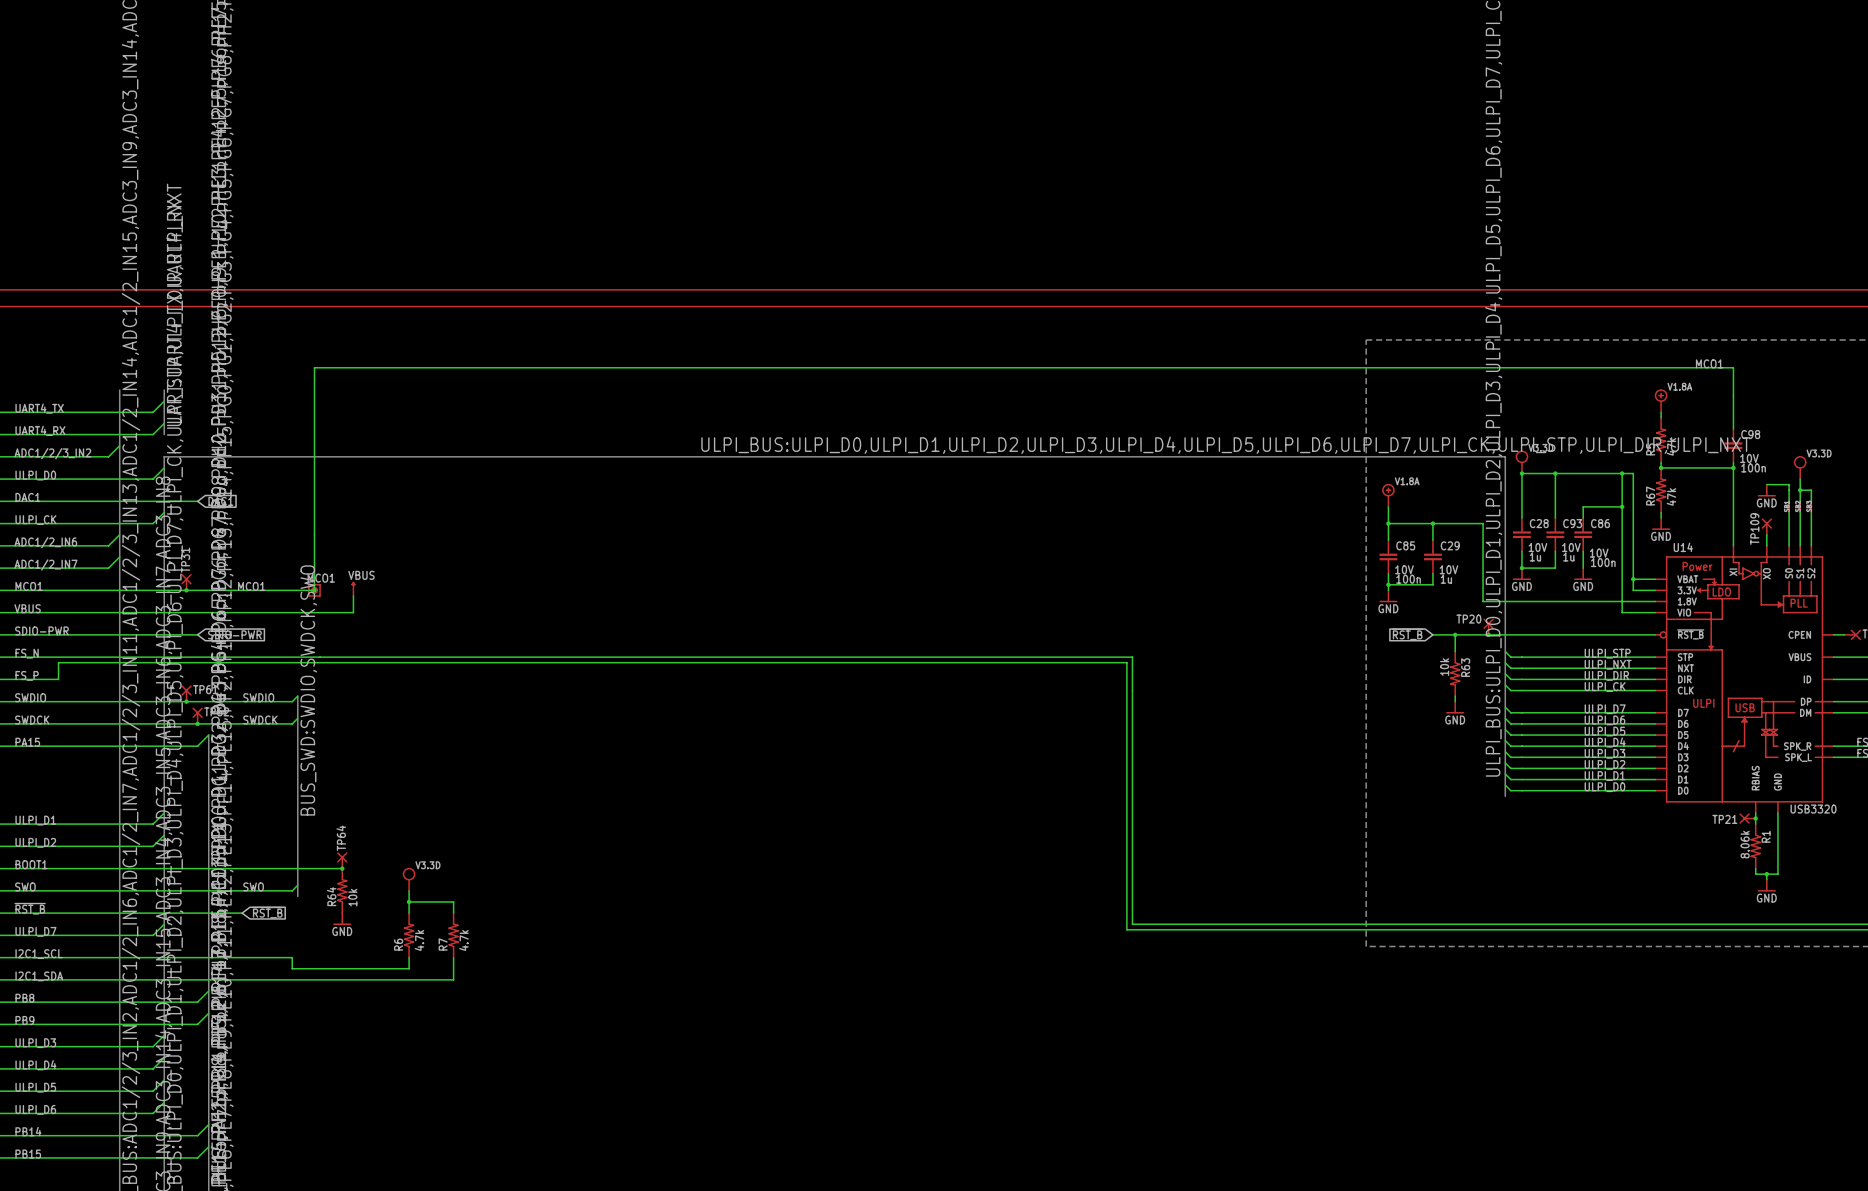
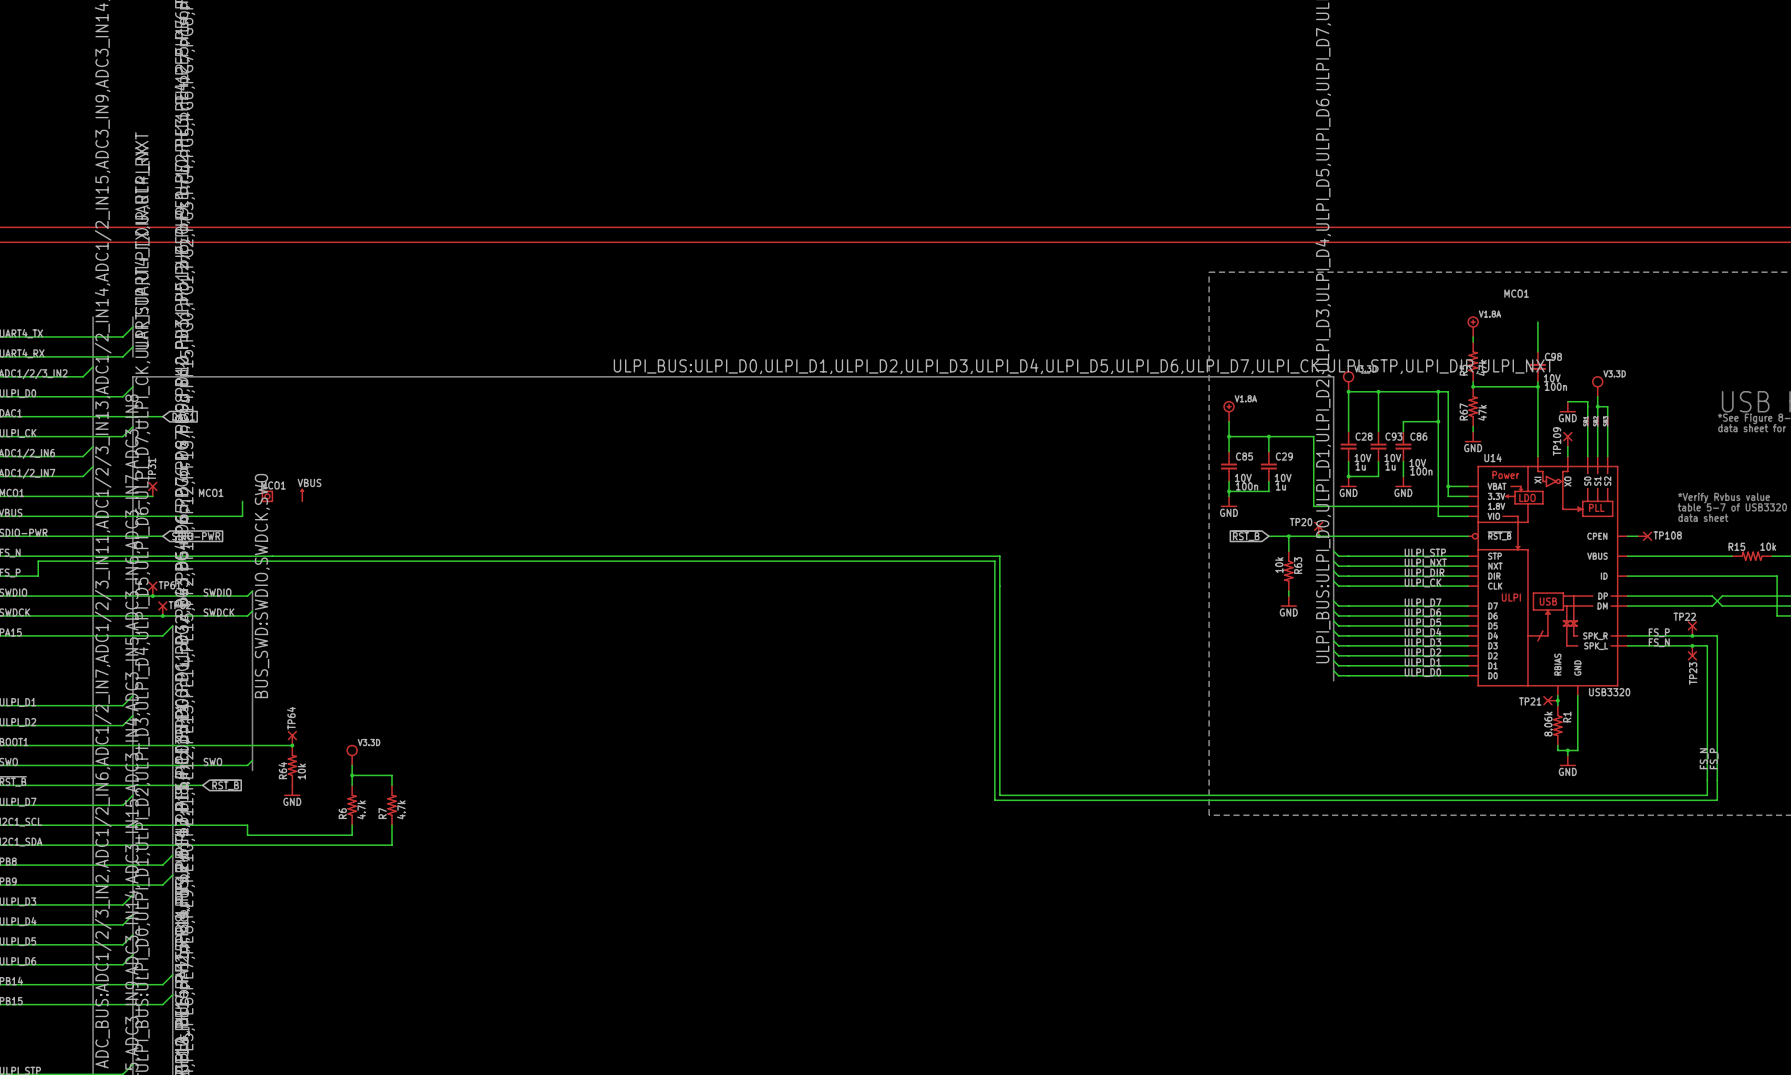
wire: (1733, 395) (1733, 367) (314, 367) (314, 590) (186, 590) -> none
junction: (186, 590) -> none
junction: (314, 590) -> none
wire: (353, 595) (353, 612) (286, 612) -> (242, 501) (242, 516)

